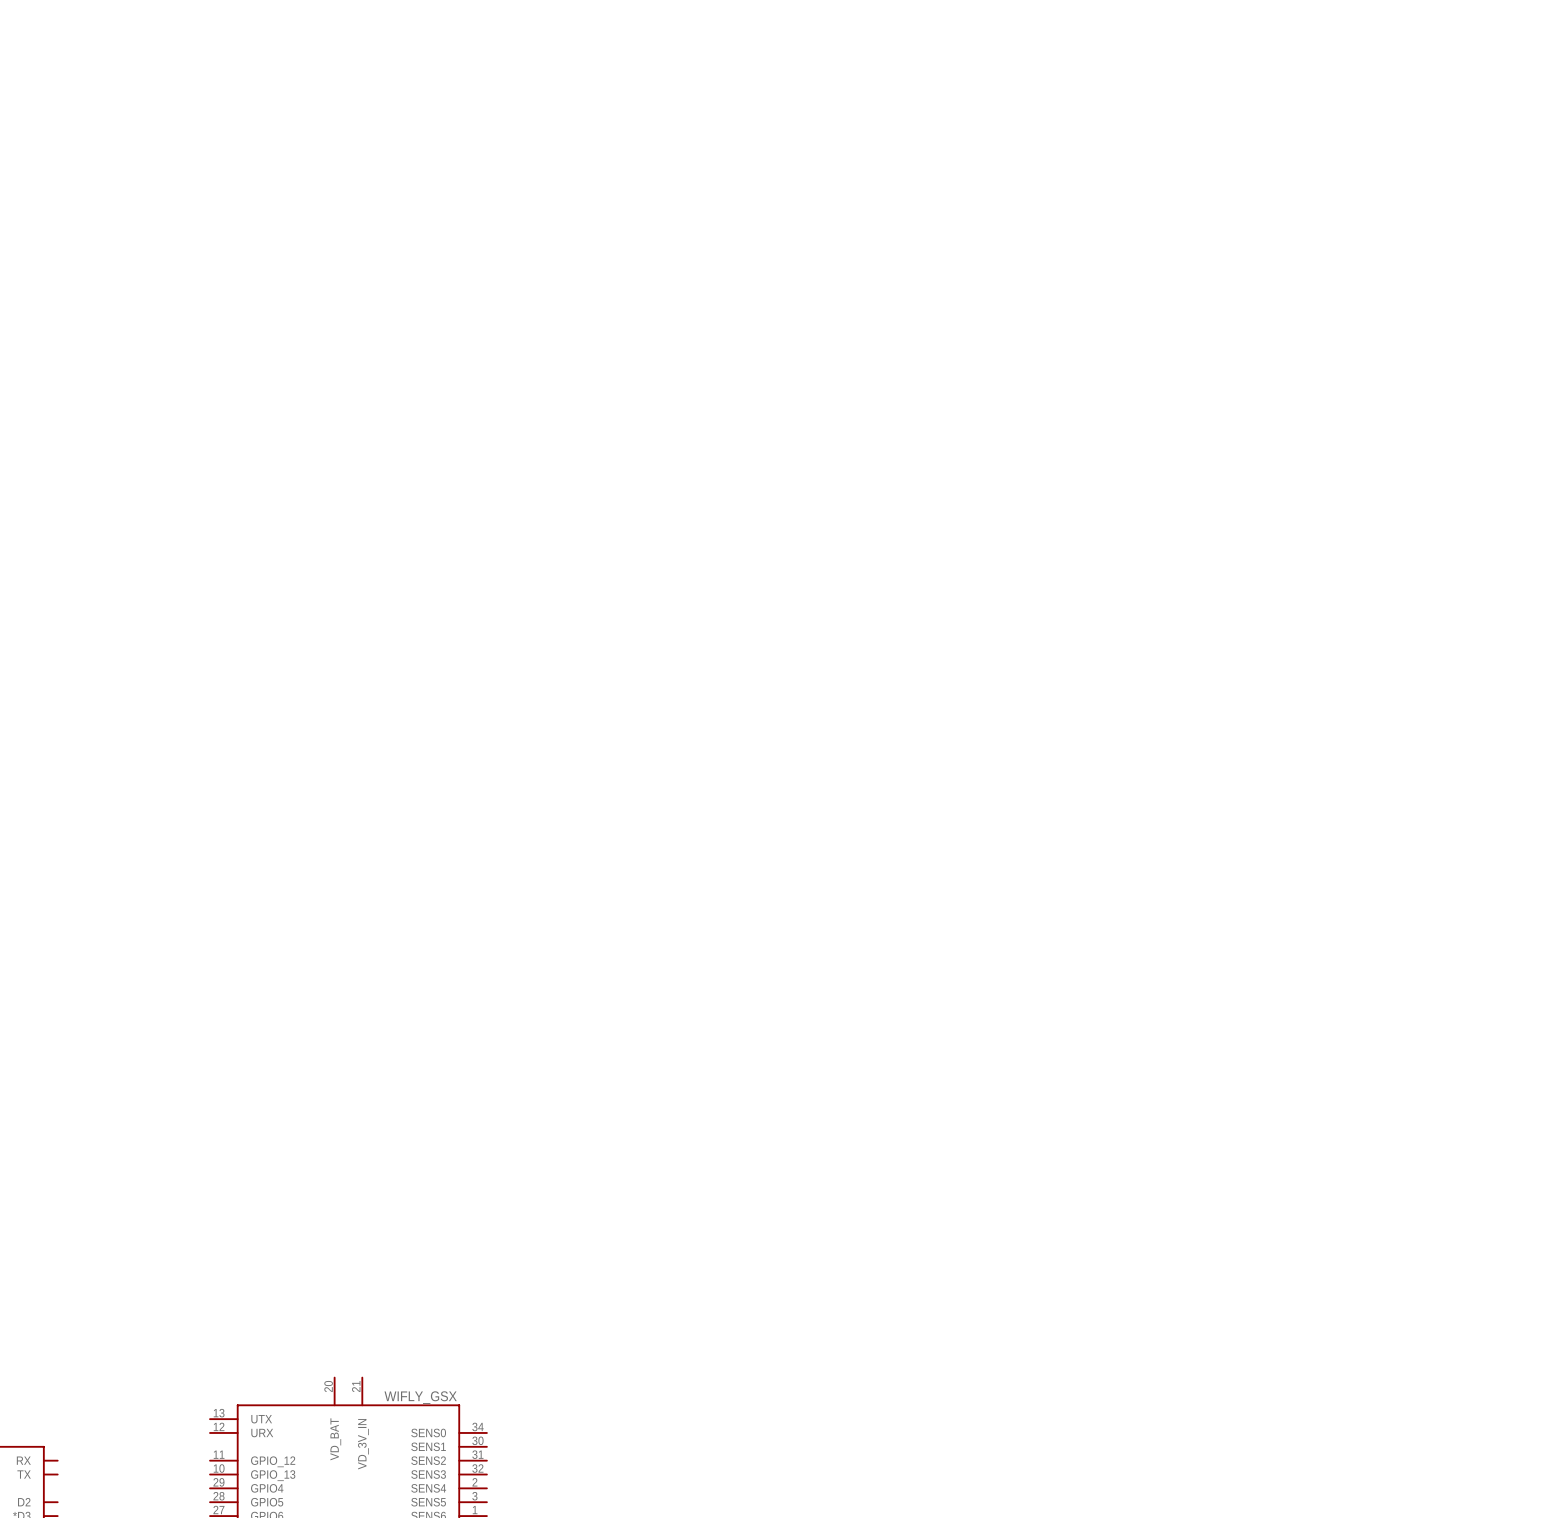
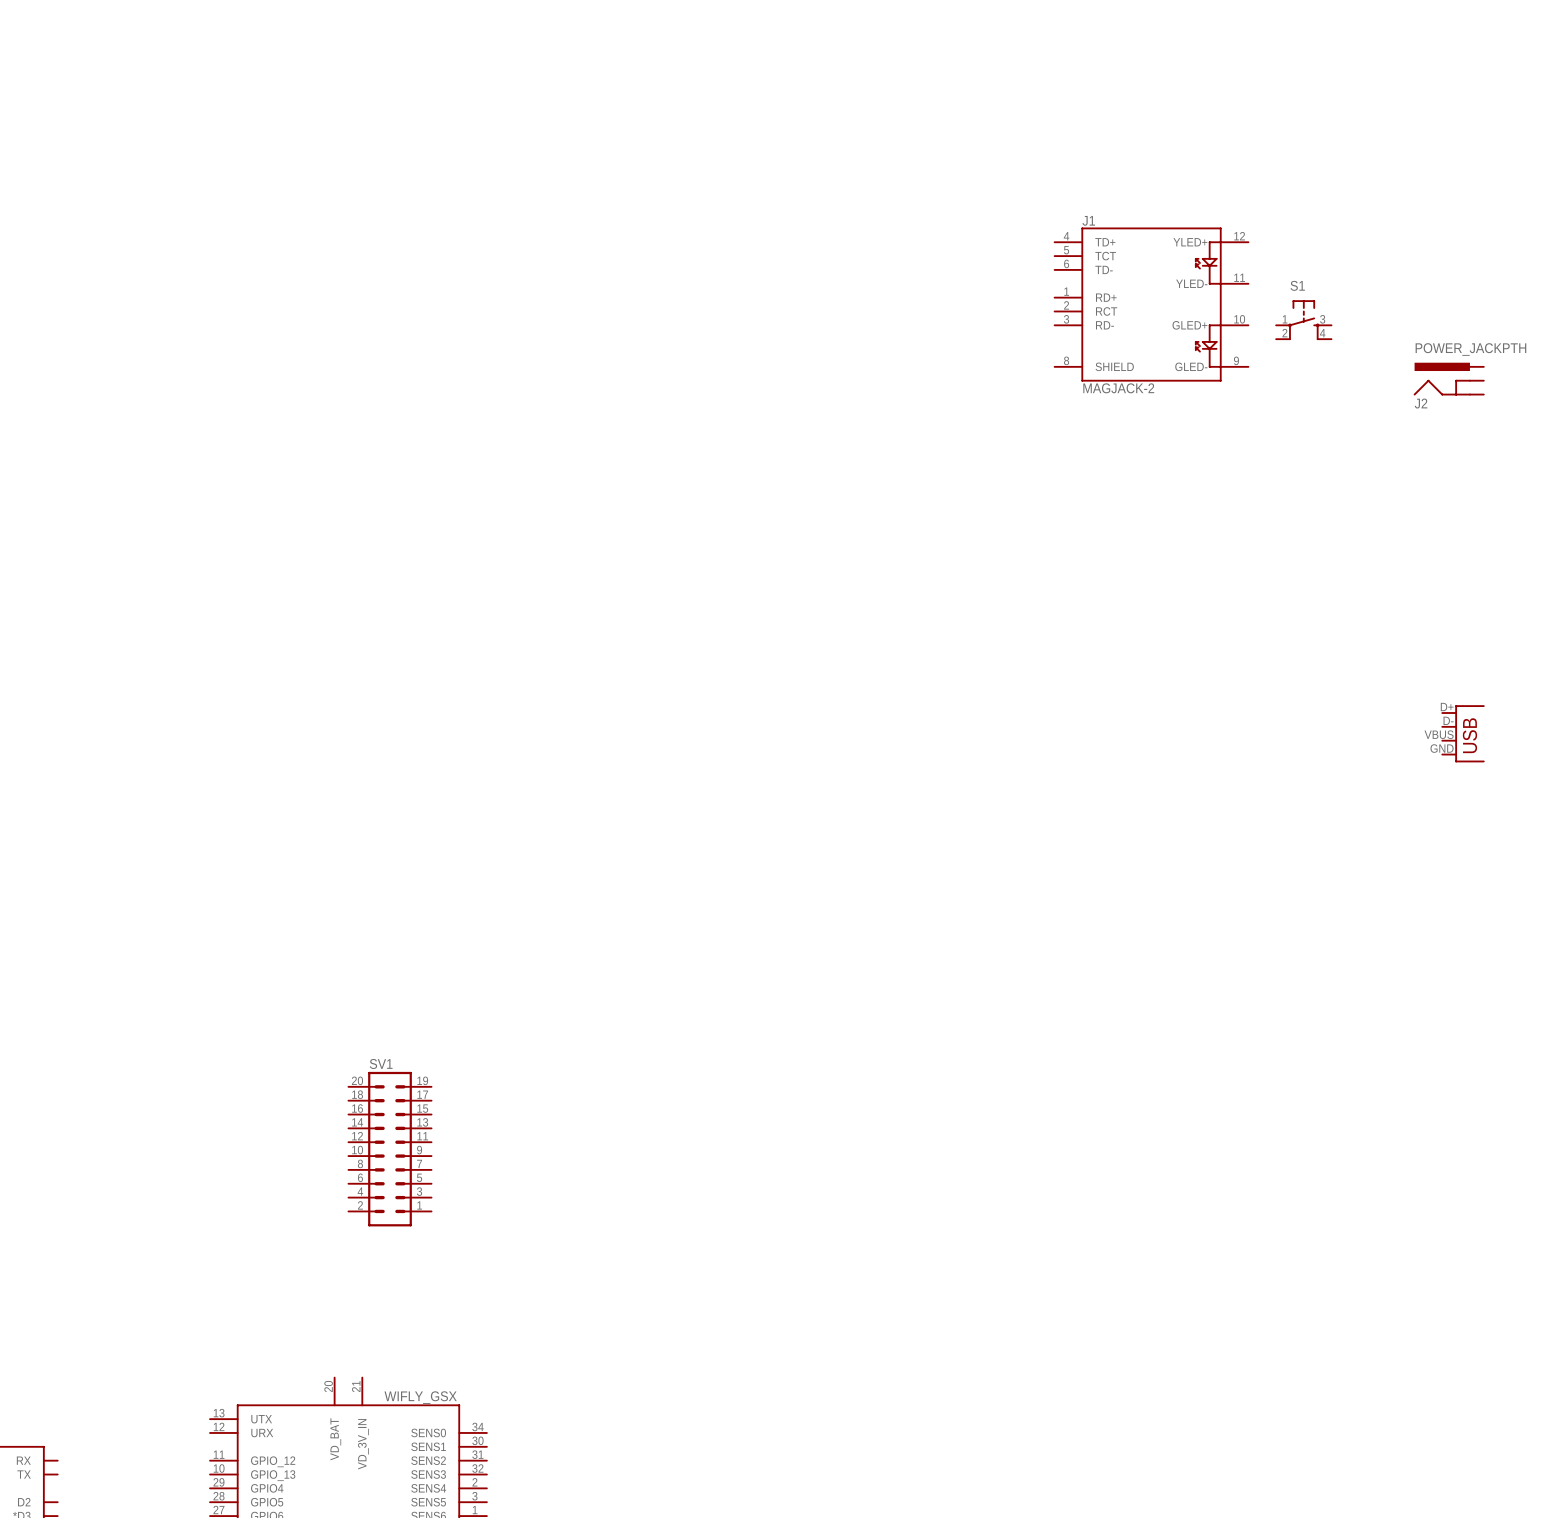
J1: none -> MAGJACK-2 (1151, 304)
S1: none -> (1303, 319)
J2: none -> POWER_JACKPTH (1448, 378)
part: none -> (1463, 733)
SV1: none -> (390, 1149)

